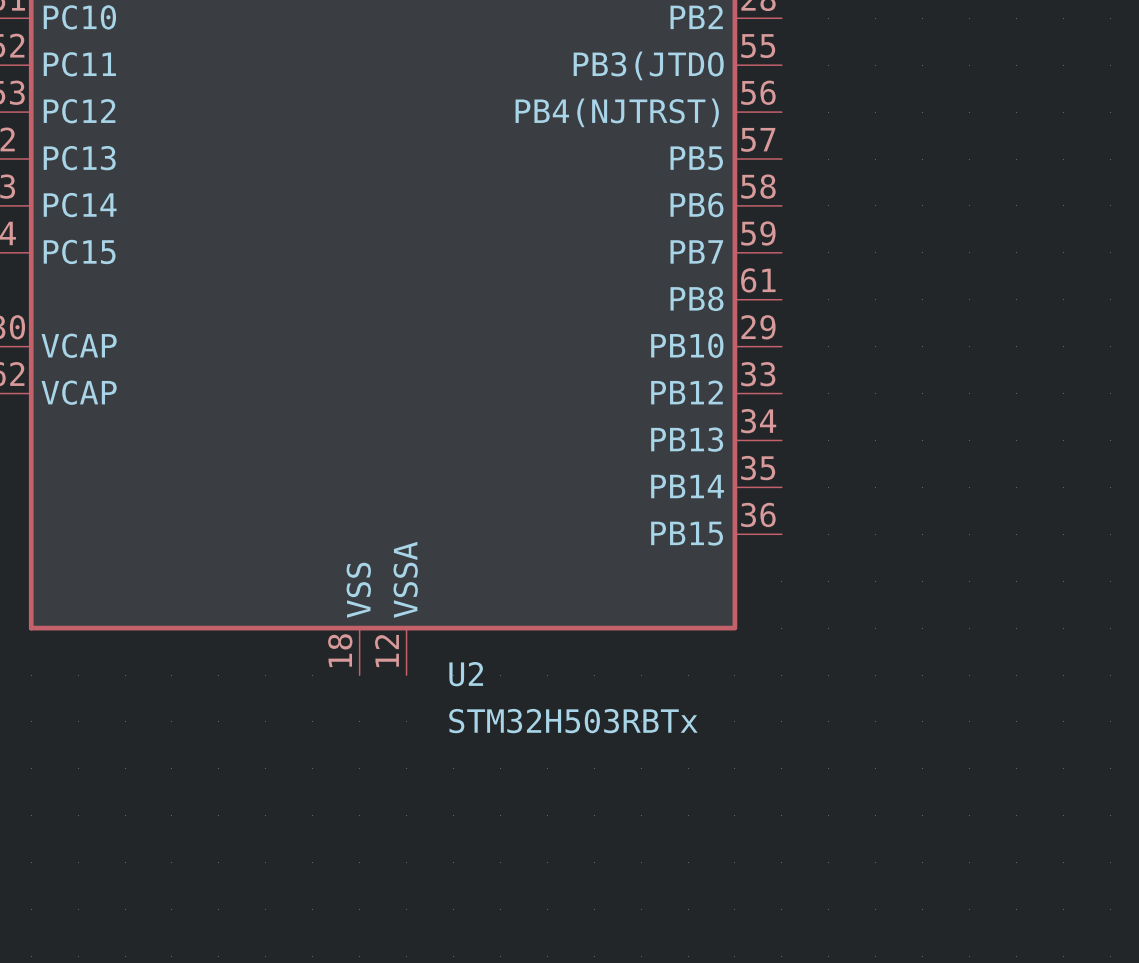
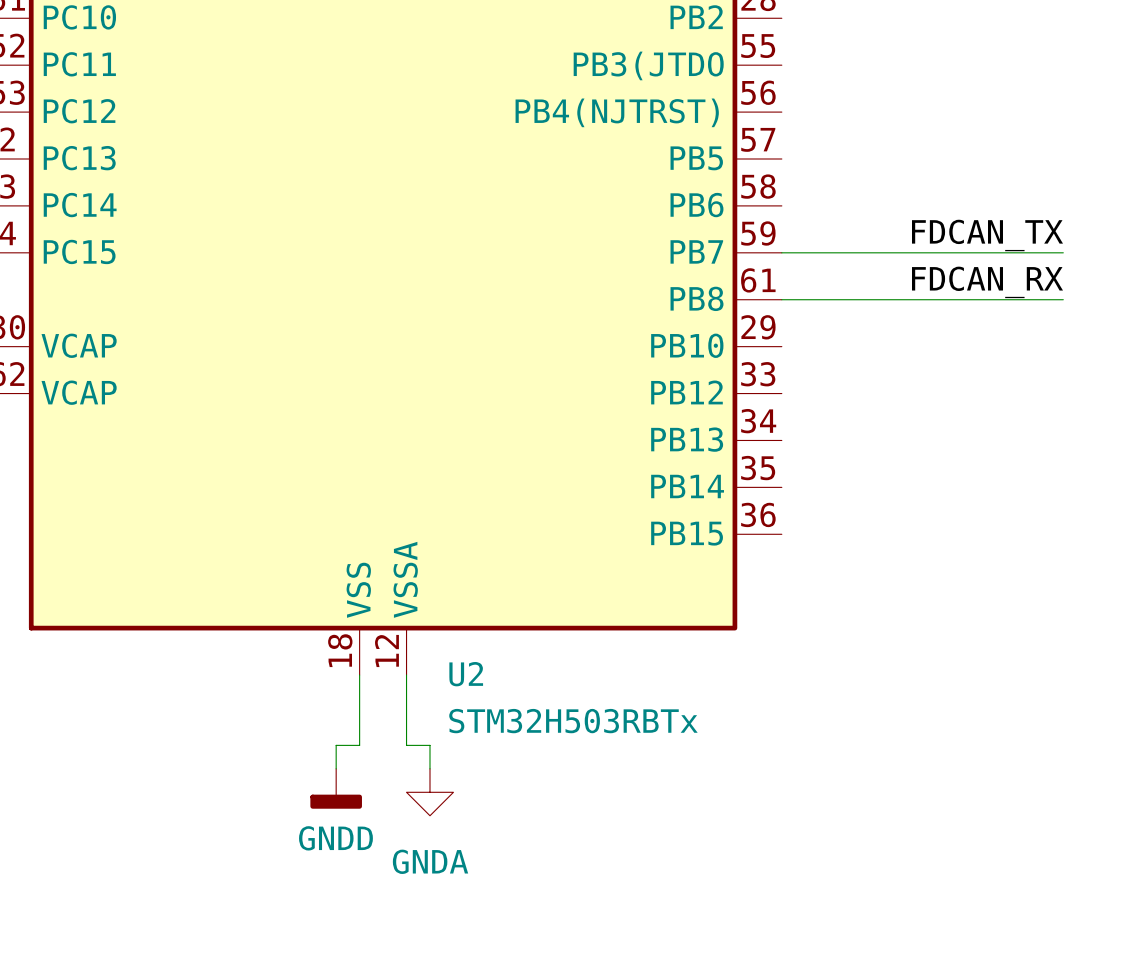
label: none -> FDCAN_TX (987, 235)
wire: none -> (781, 252) (1063, 252)
label: none -> FDCAN_RX (987, 282)
wire: none -> (781, 299) (1063, 299)
wire: none -> (359, 675) (359, 745) (336, 745) (336, 768)
wire: none -> (406, 675) (406, 745) (429, 745) (429, 768)
power symbol: none -> GNDD (336, 788)
power symbol: none -> GNDA (429, 792)

